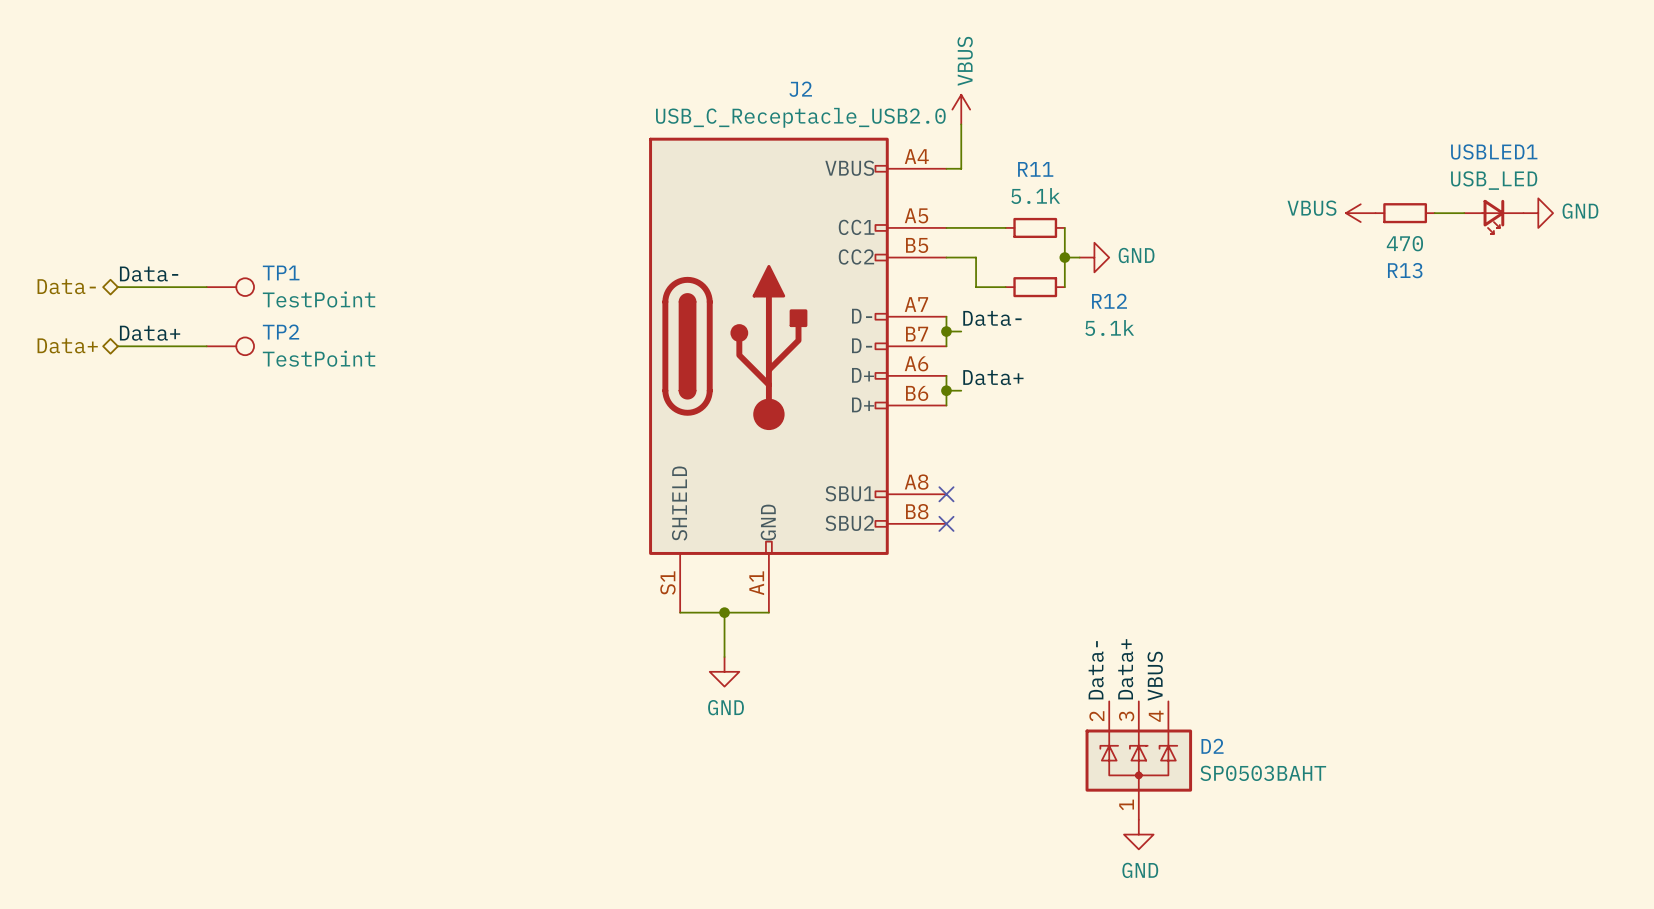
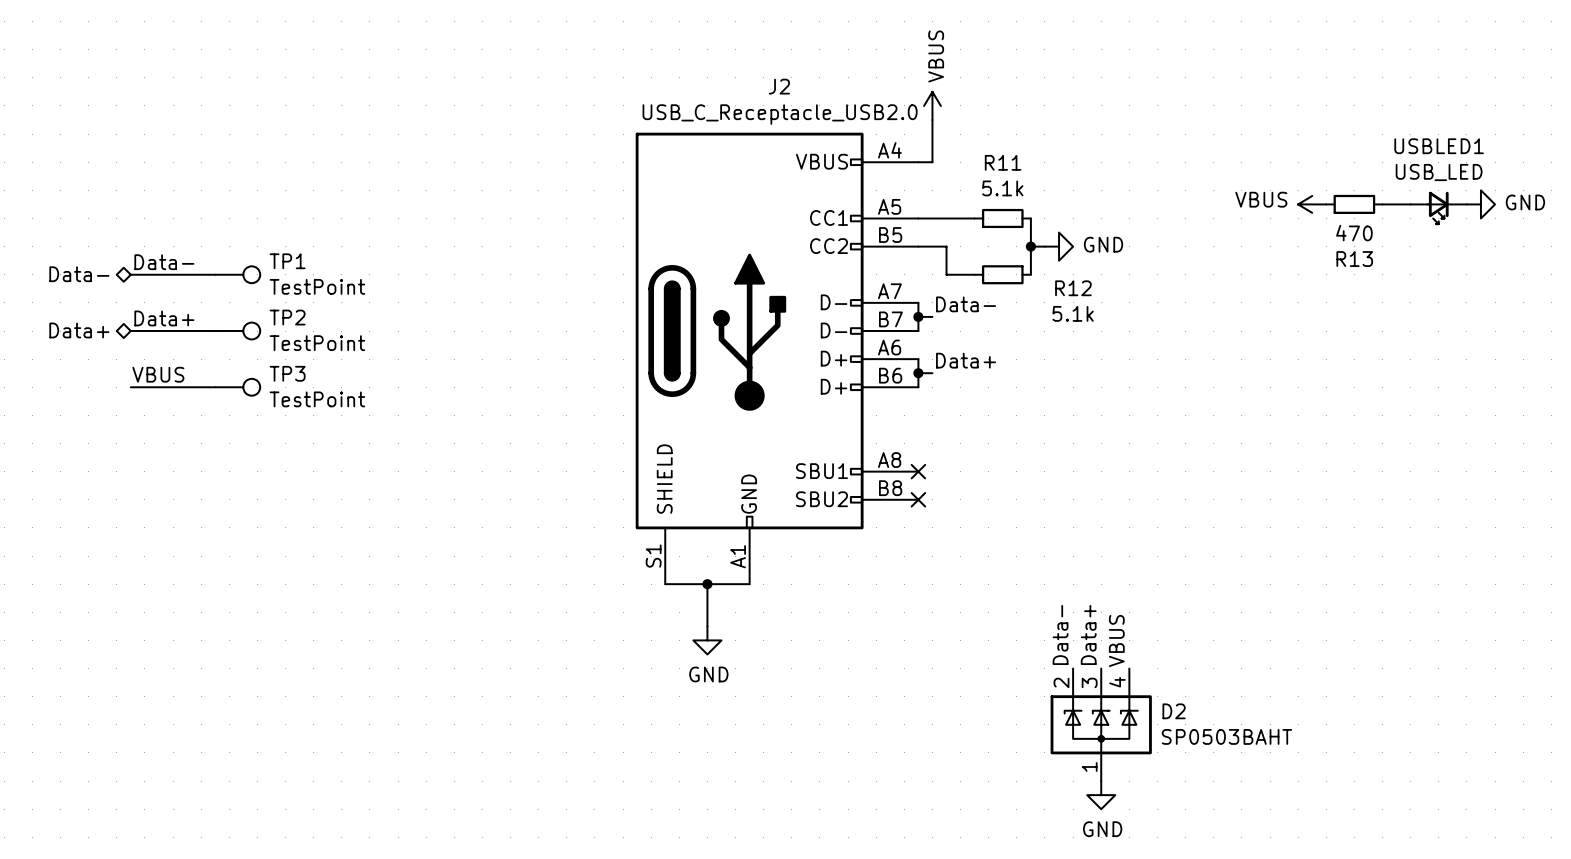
label: none -> VBUS (158, 374)
wire: none -> (130, 387) (215, 387)
TP3: none -> TestPoint (237, 387)

